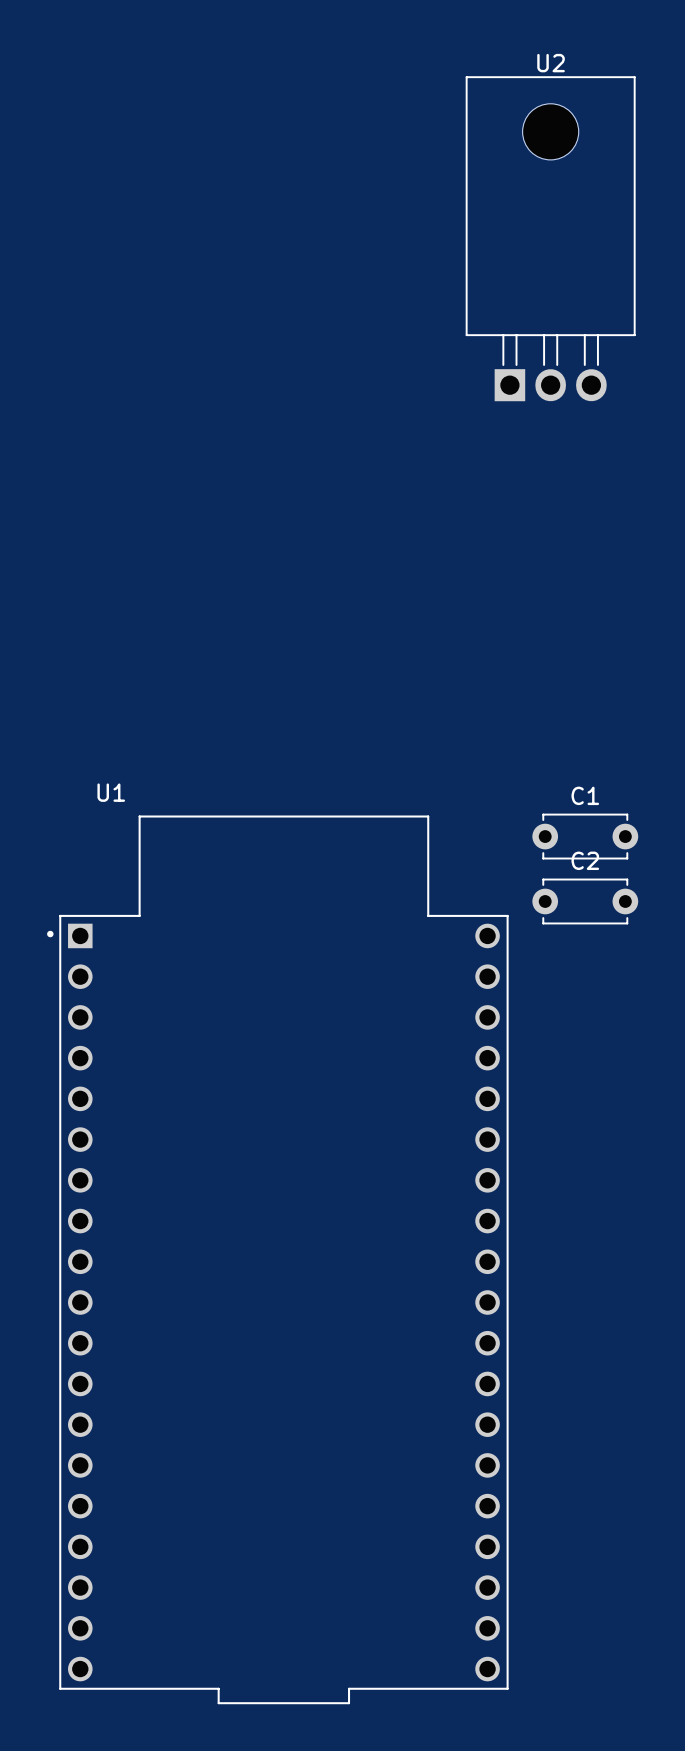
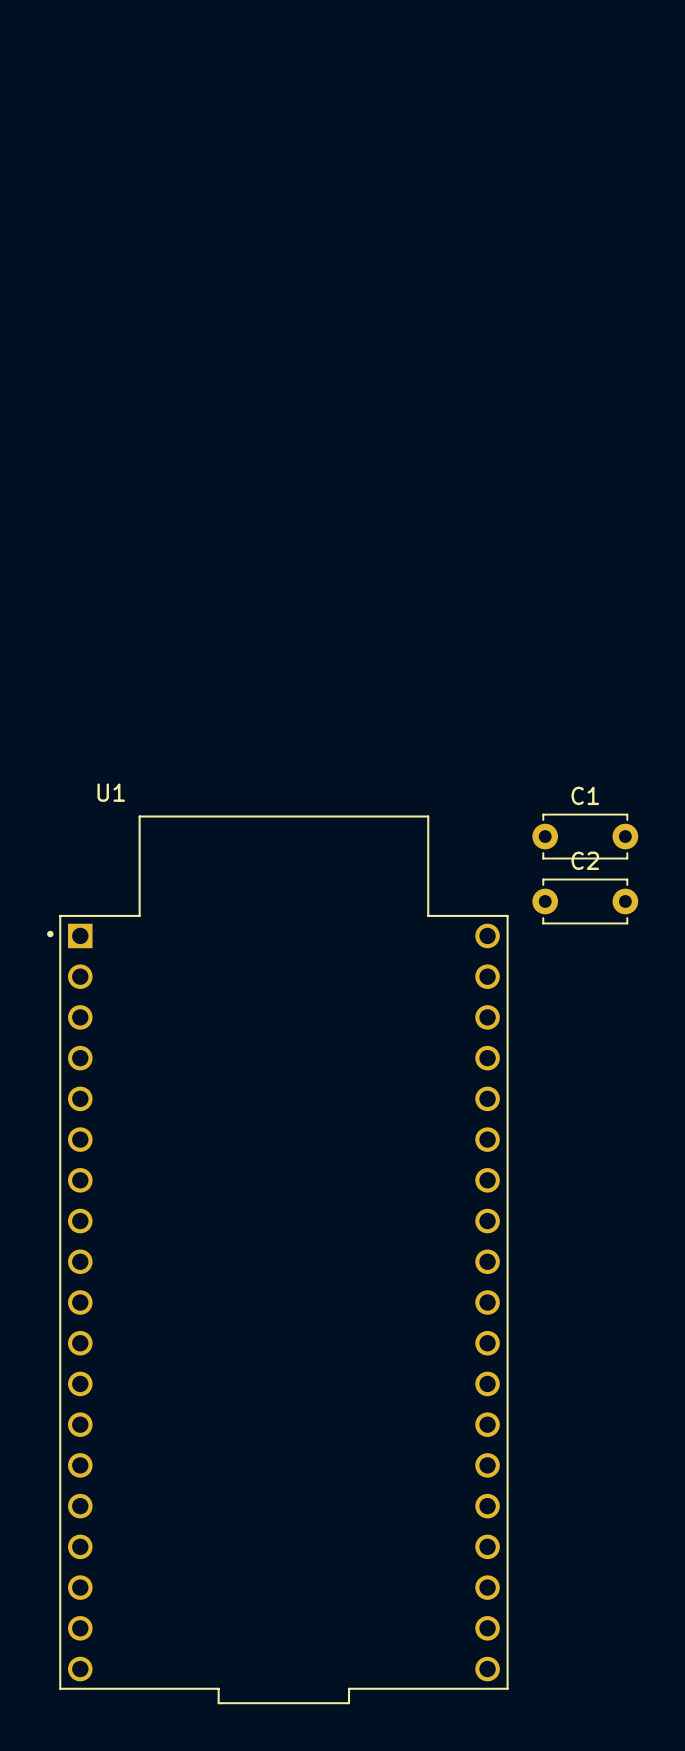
U2: (550, 238) -> none

